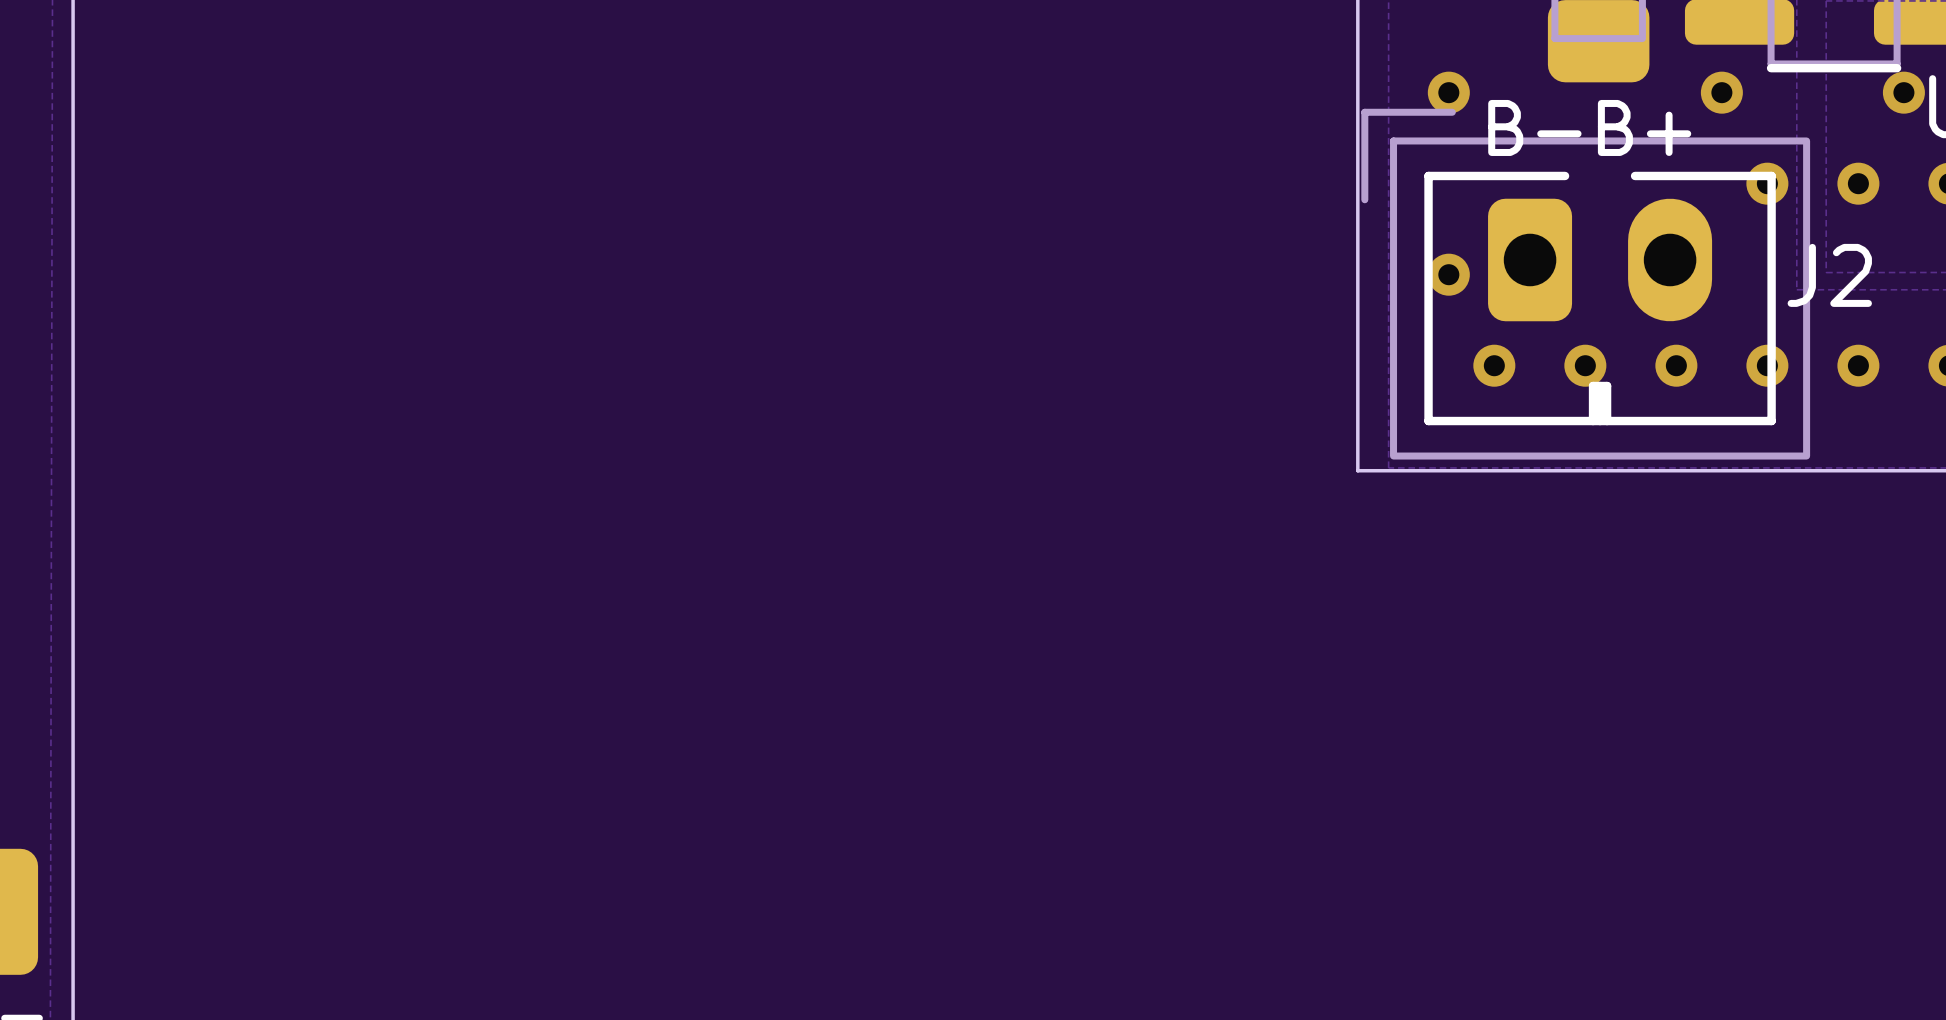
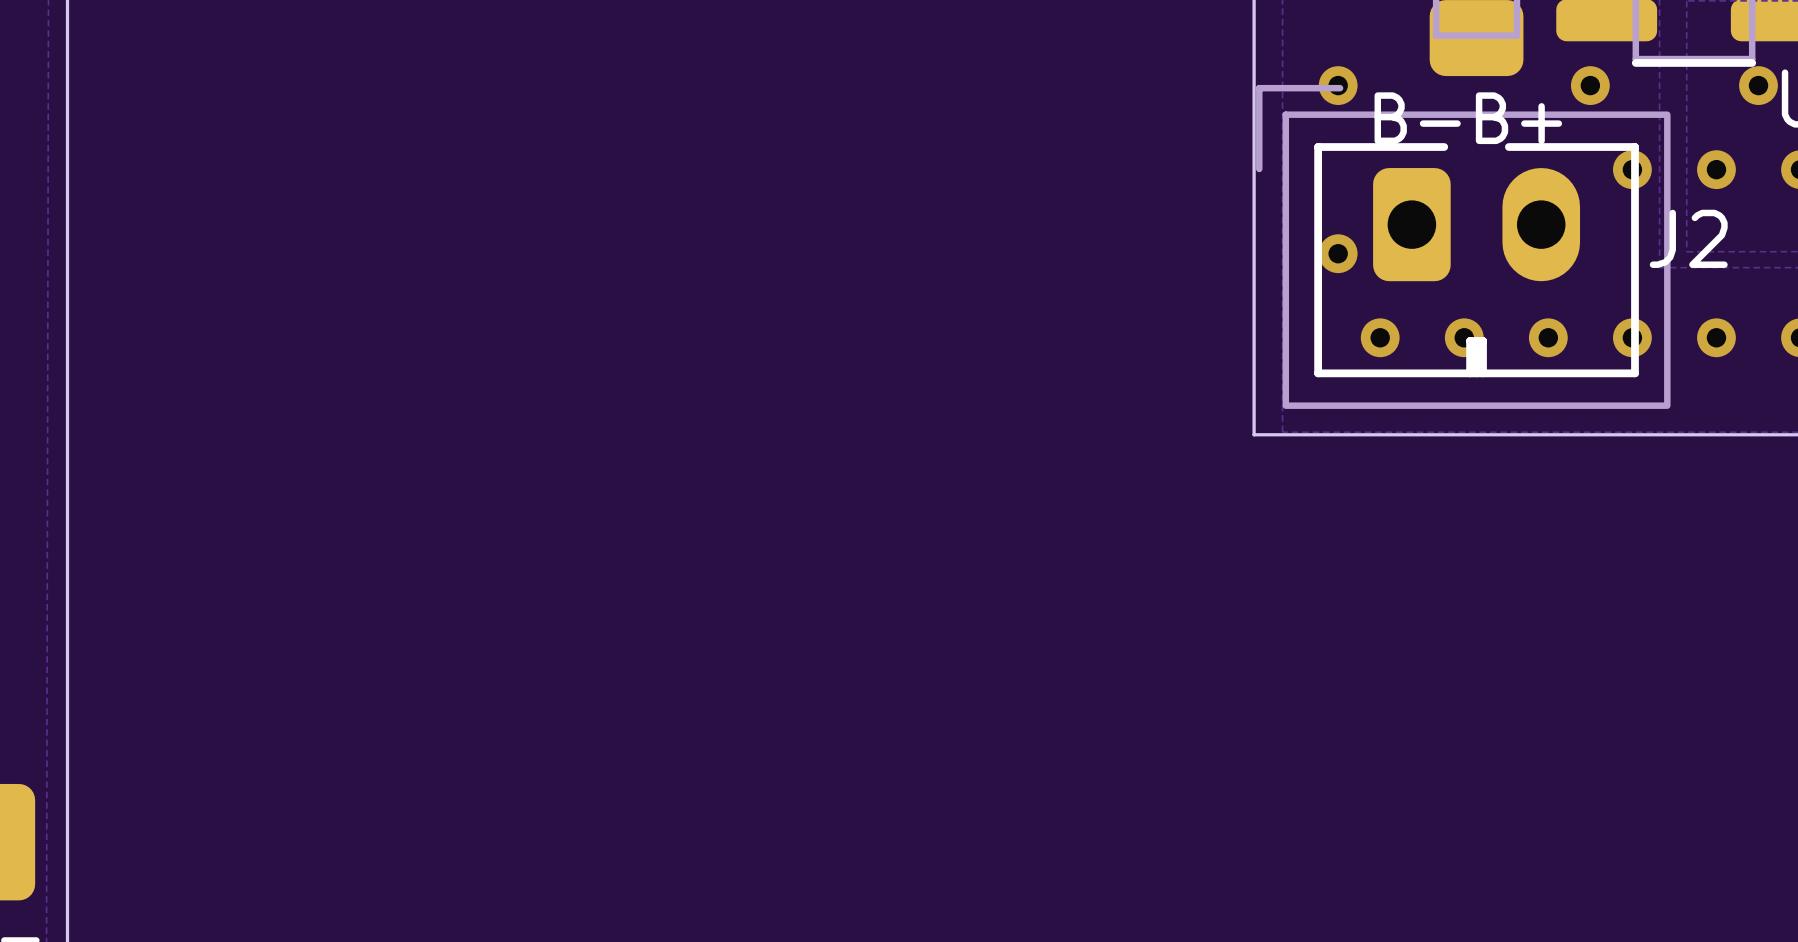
J2 position: (1585, 284) -> (1463, 246)

